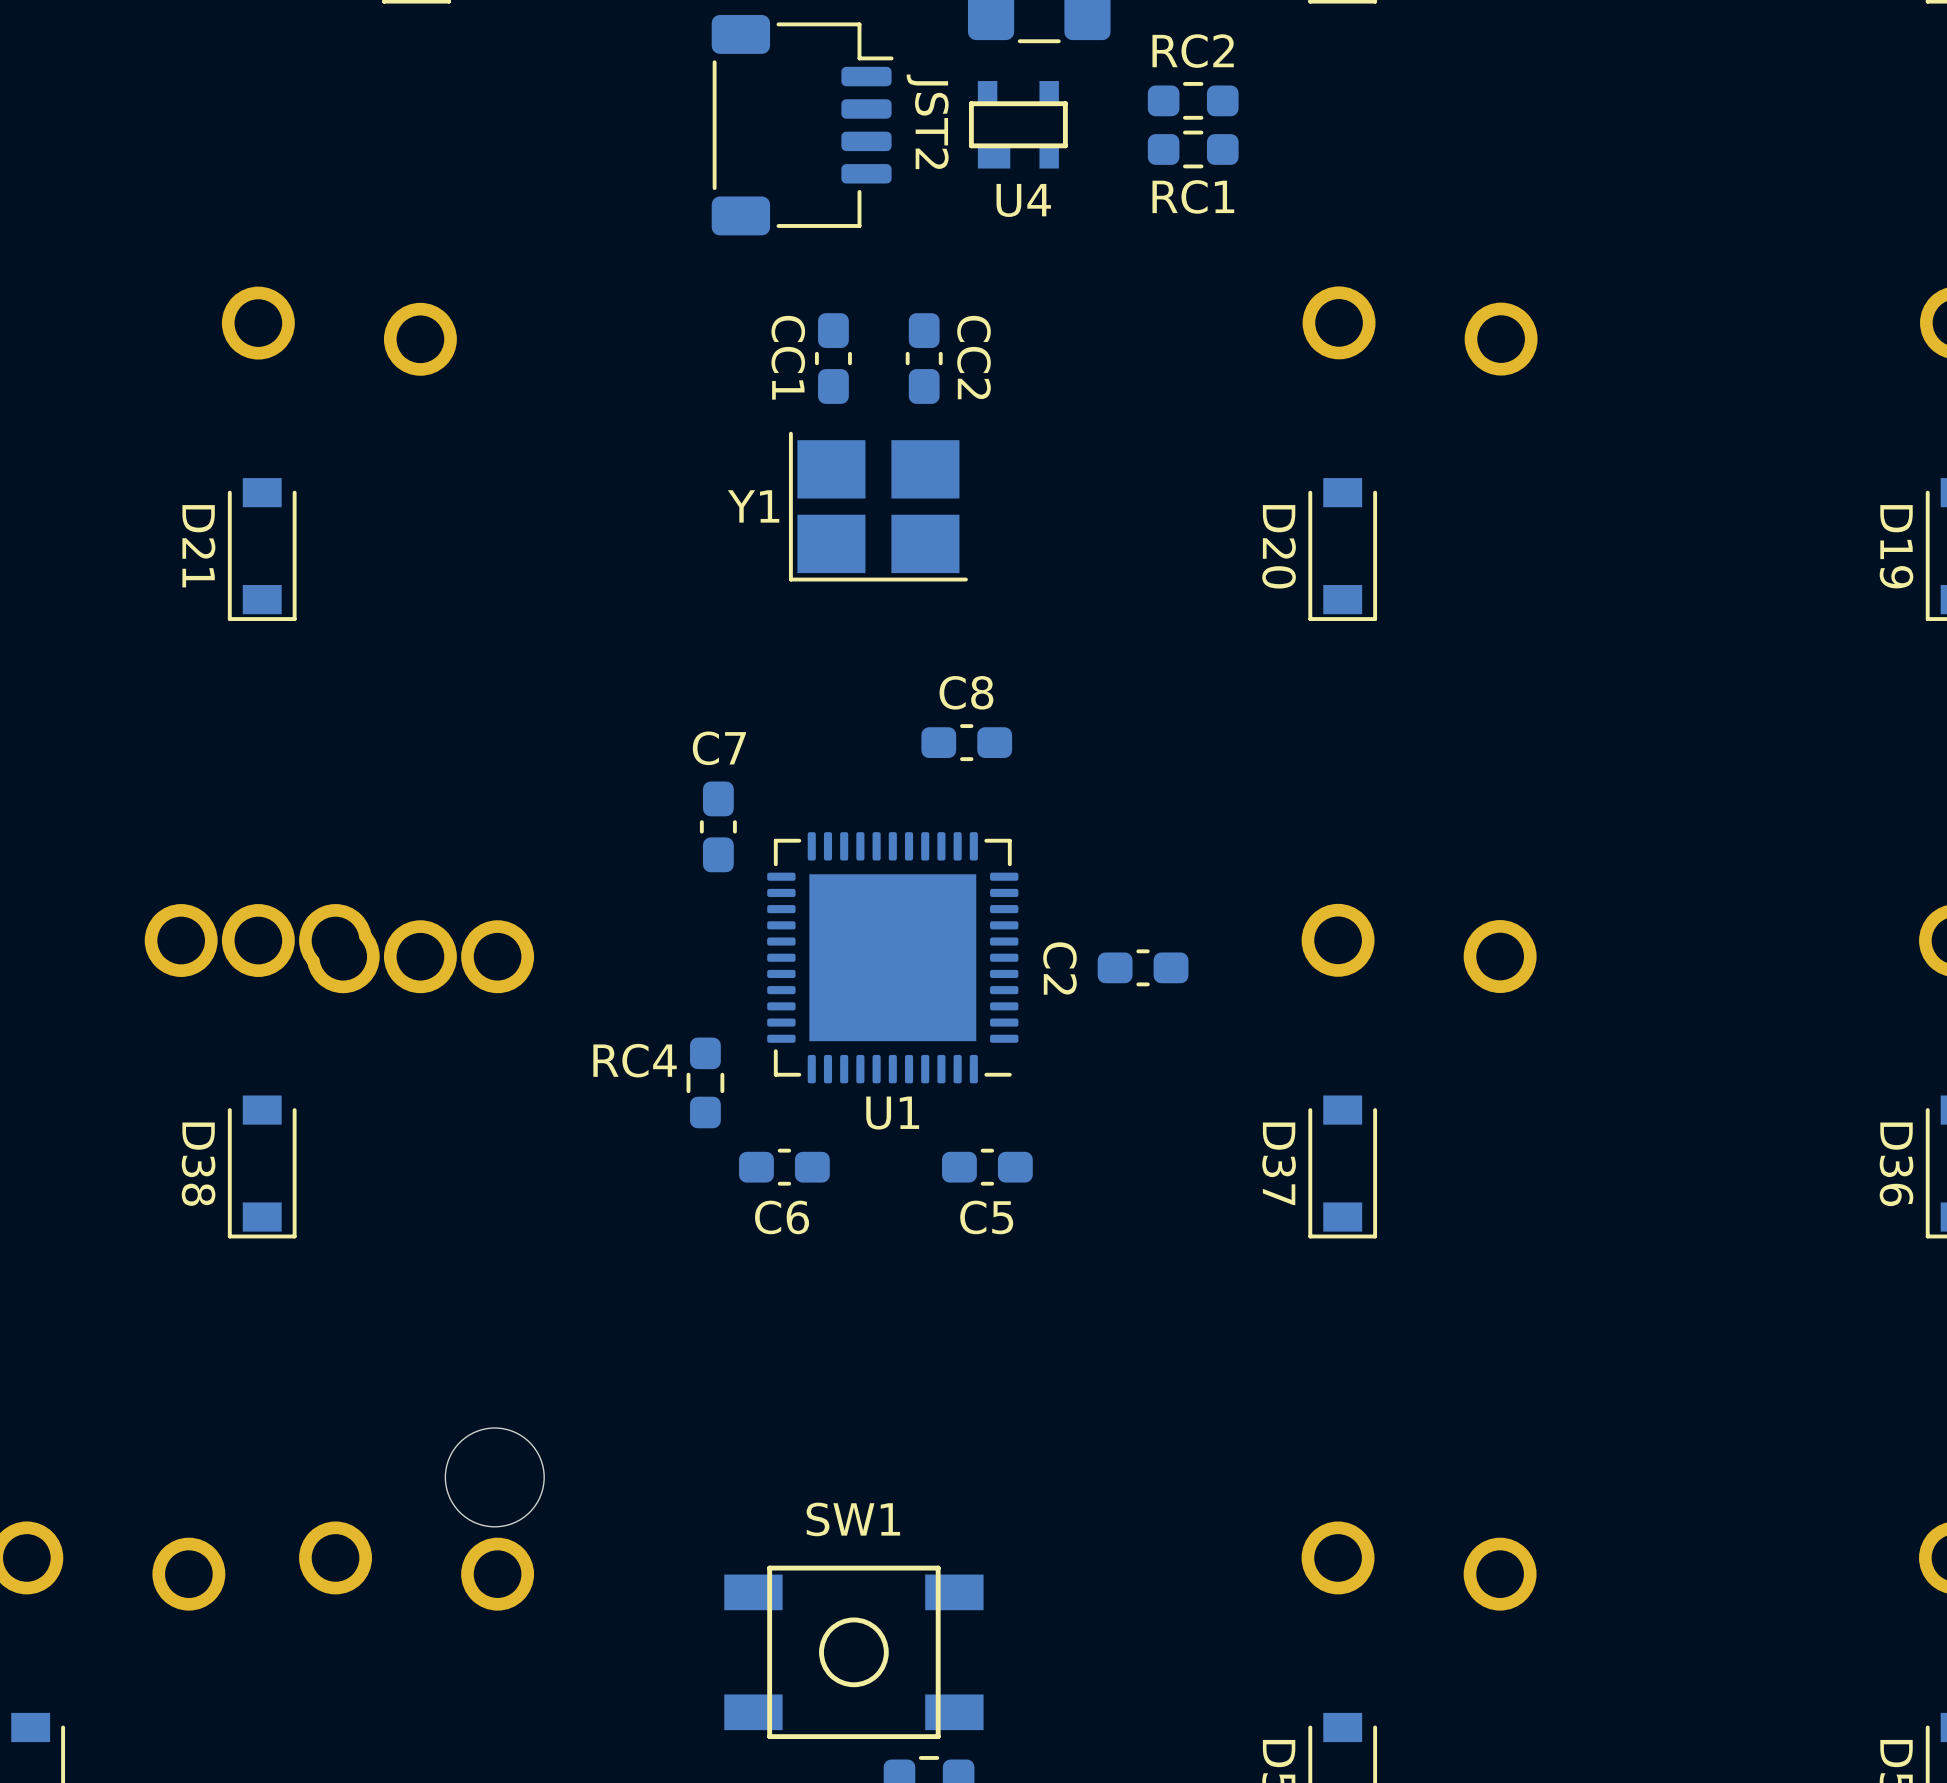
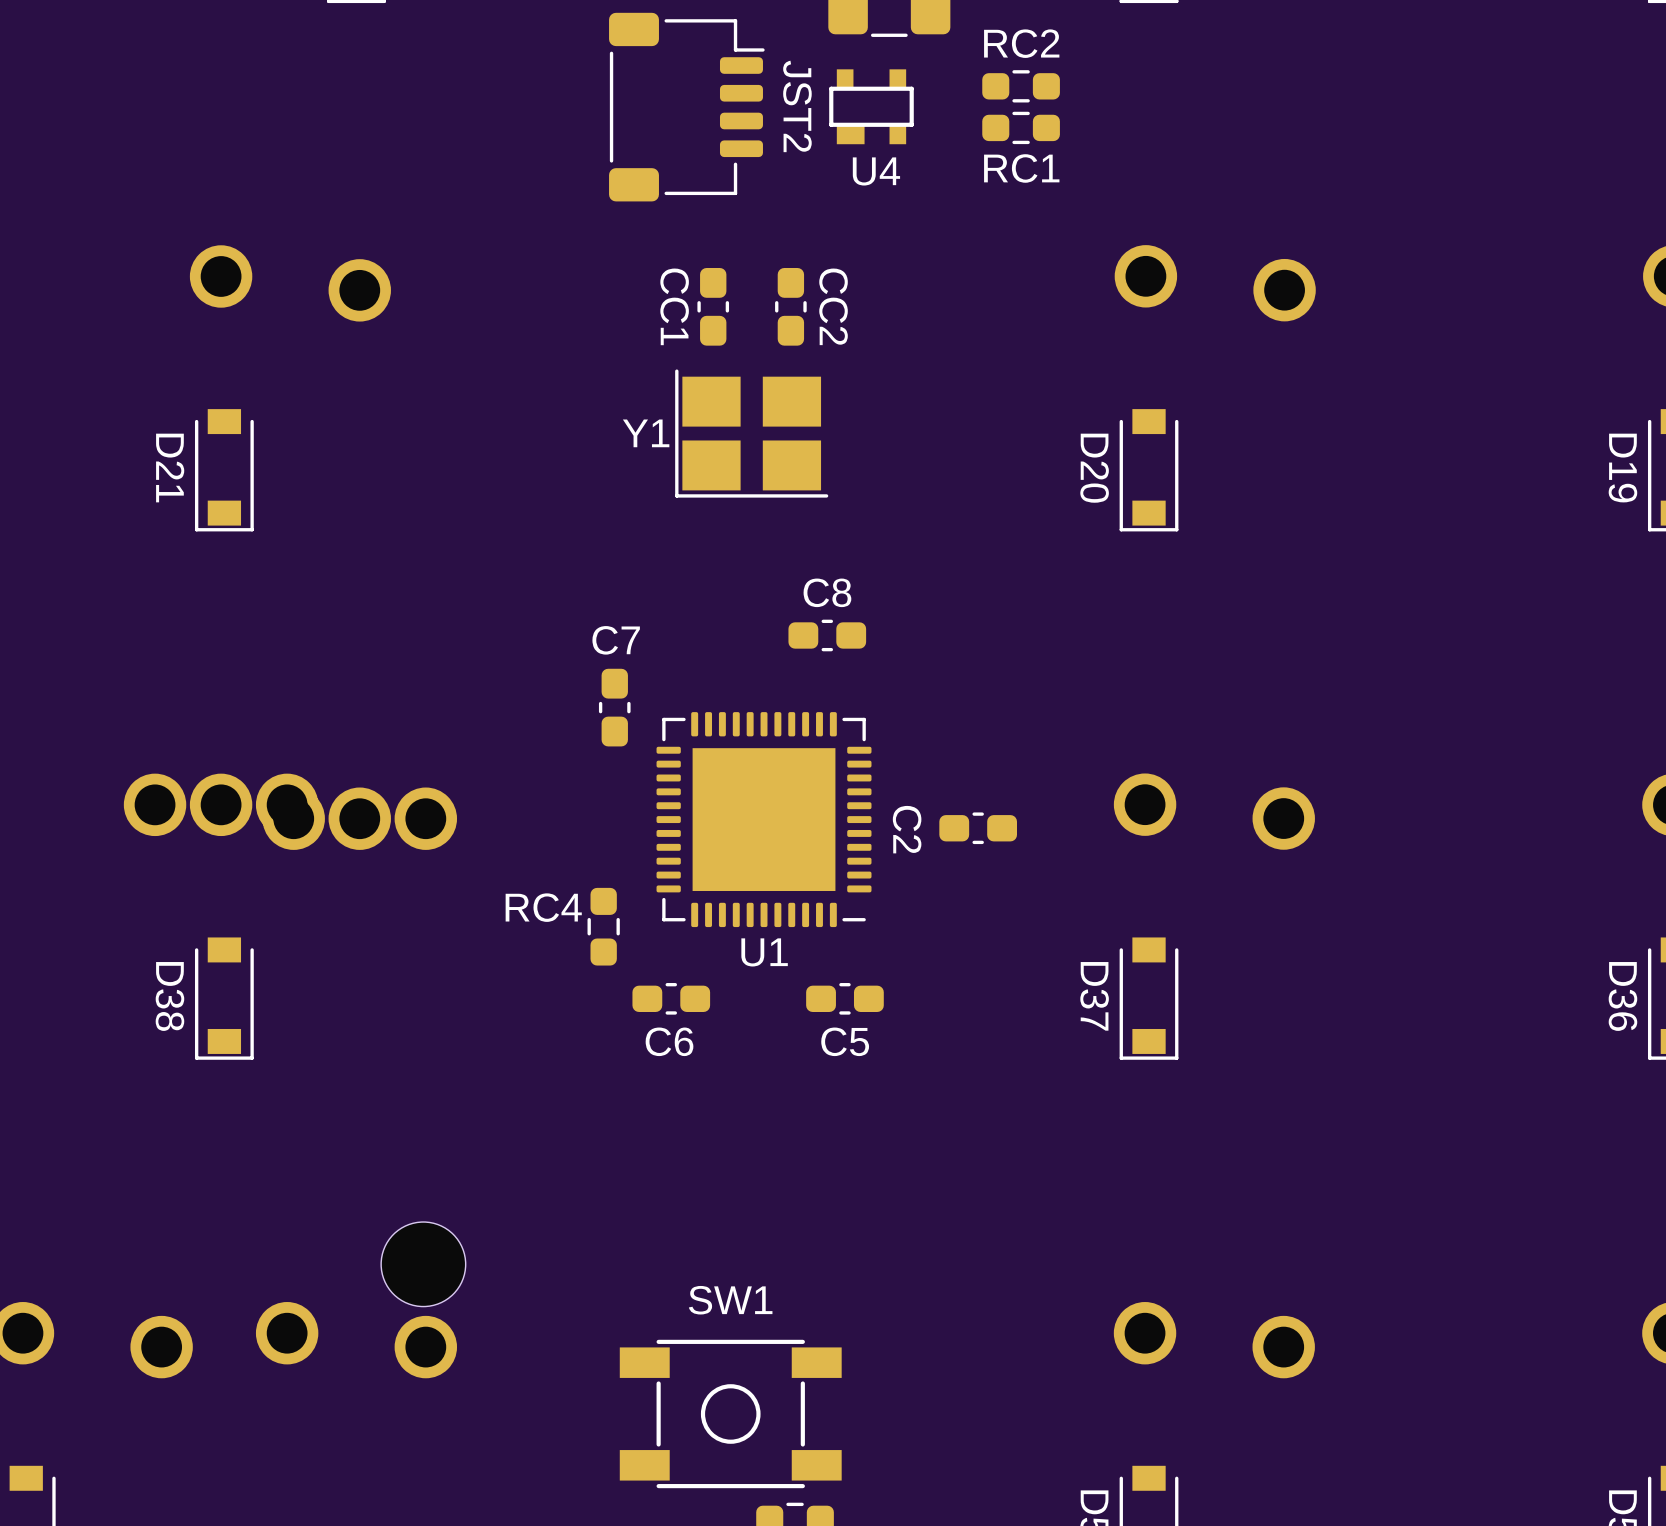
SW1 footprint: [724, 1565, 984, 1740] -> [619, 1339, 842, 1489]

